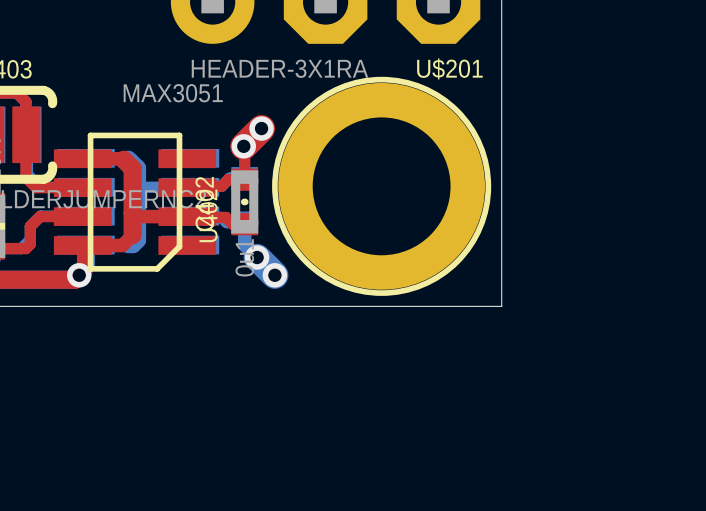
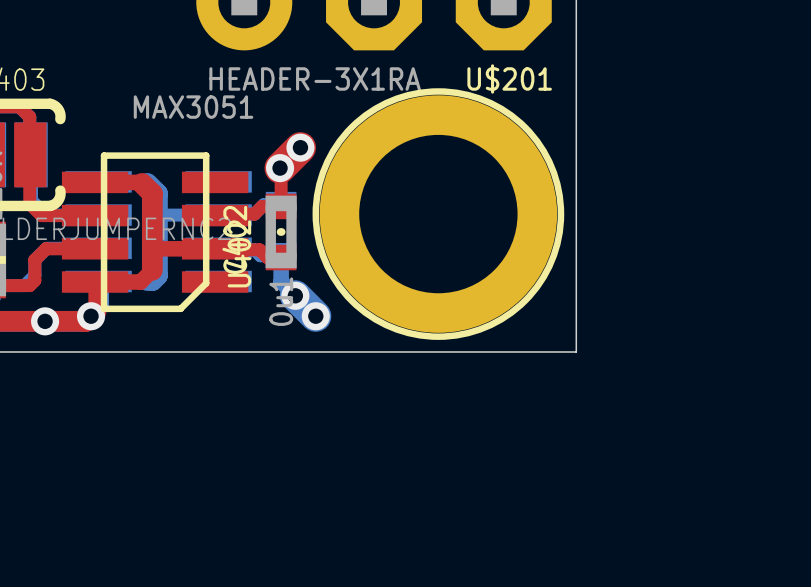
via: none -> (45, 321)

